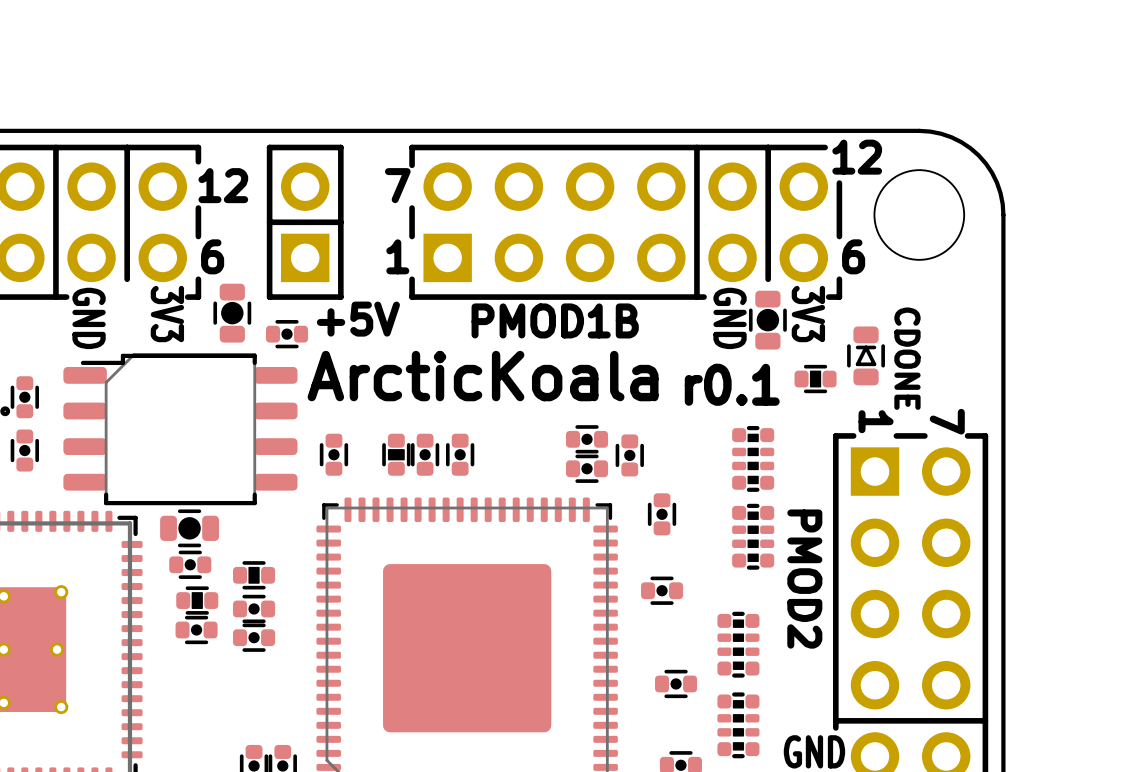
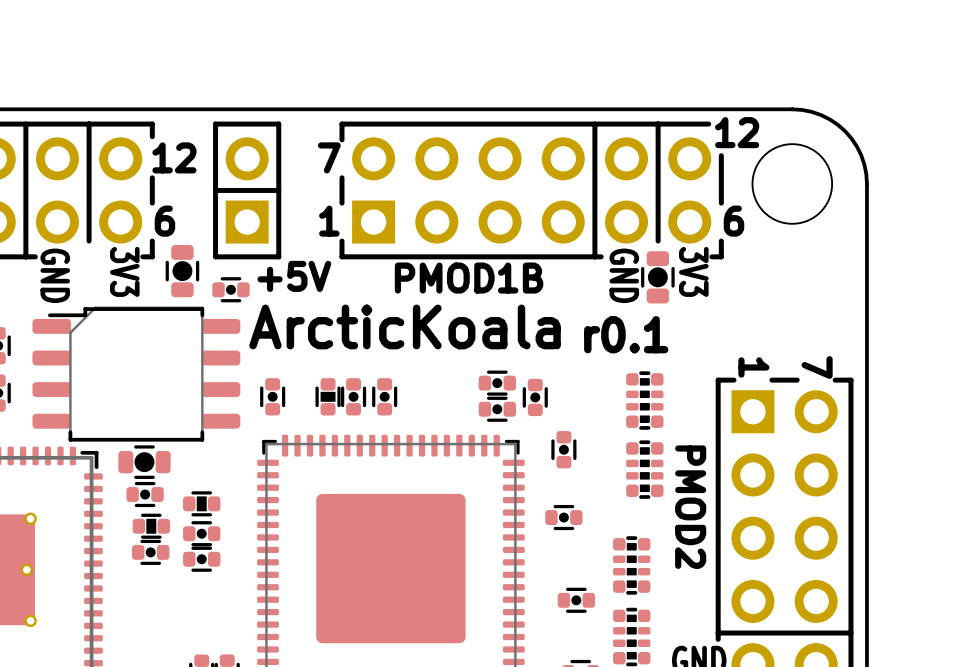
part: (866, 355) -> none
text: CDONE (907, 358) -> none
part: (815, 379) -> none

